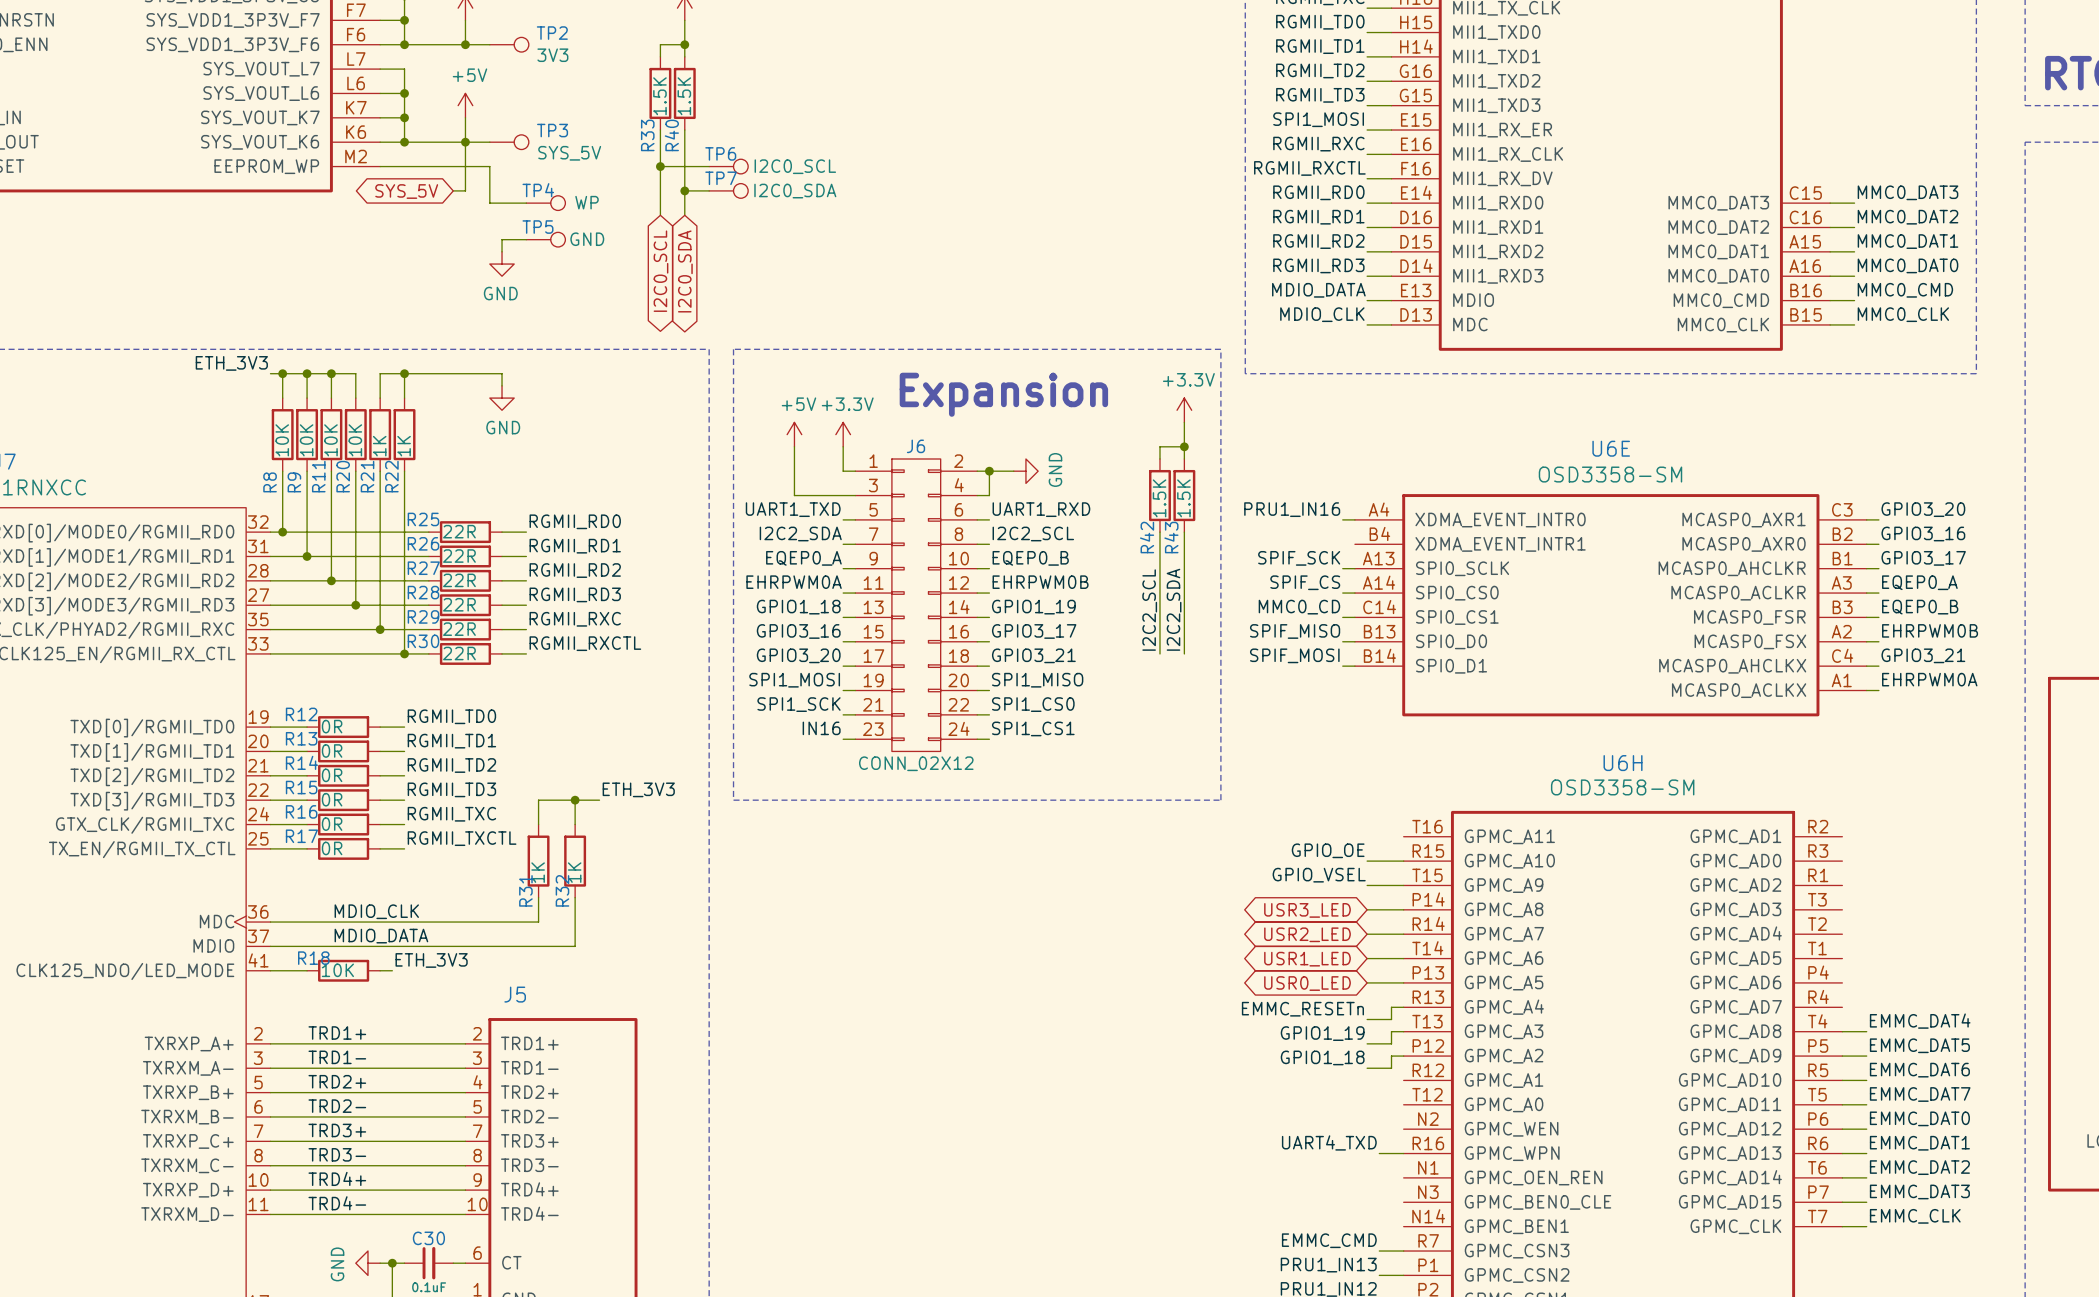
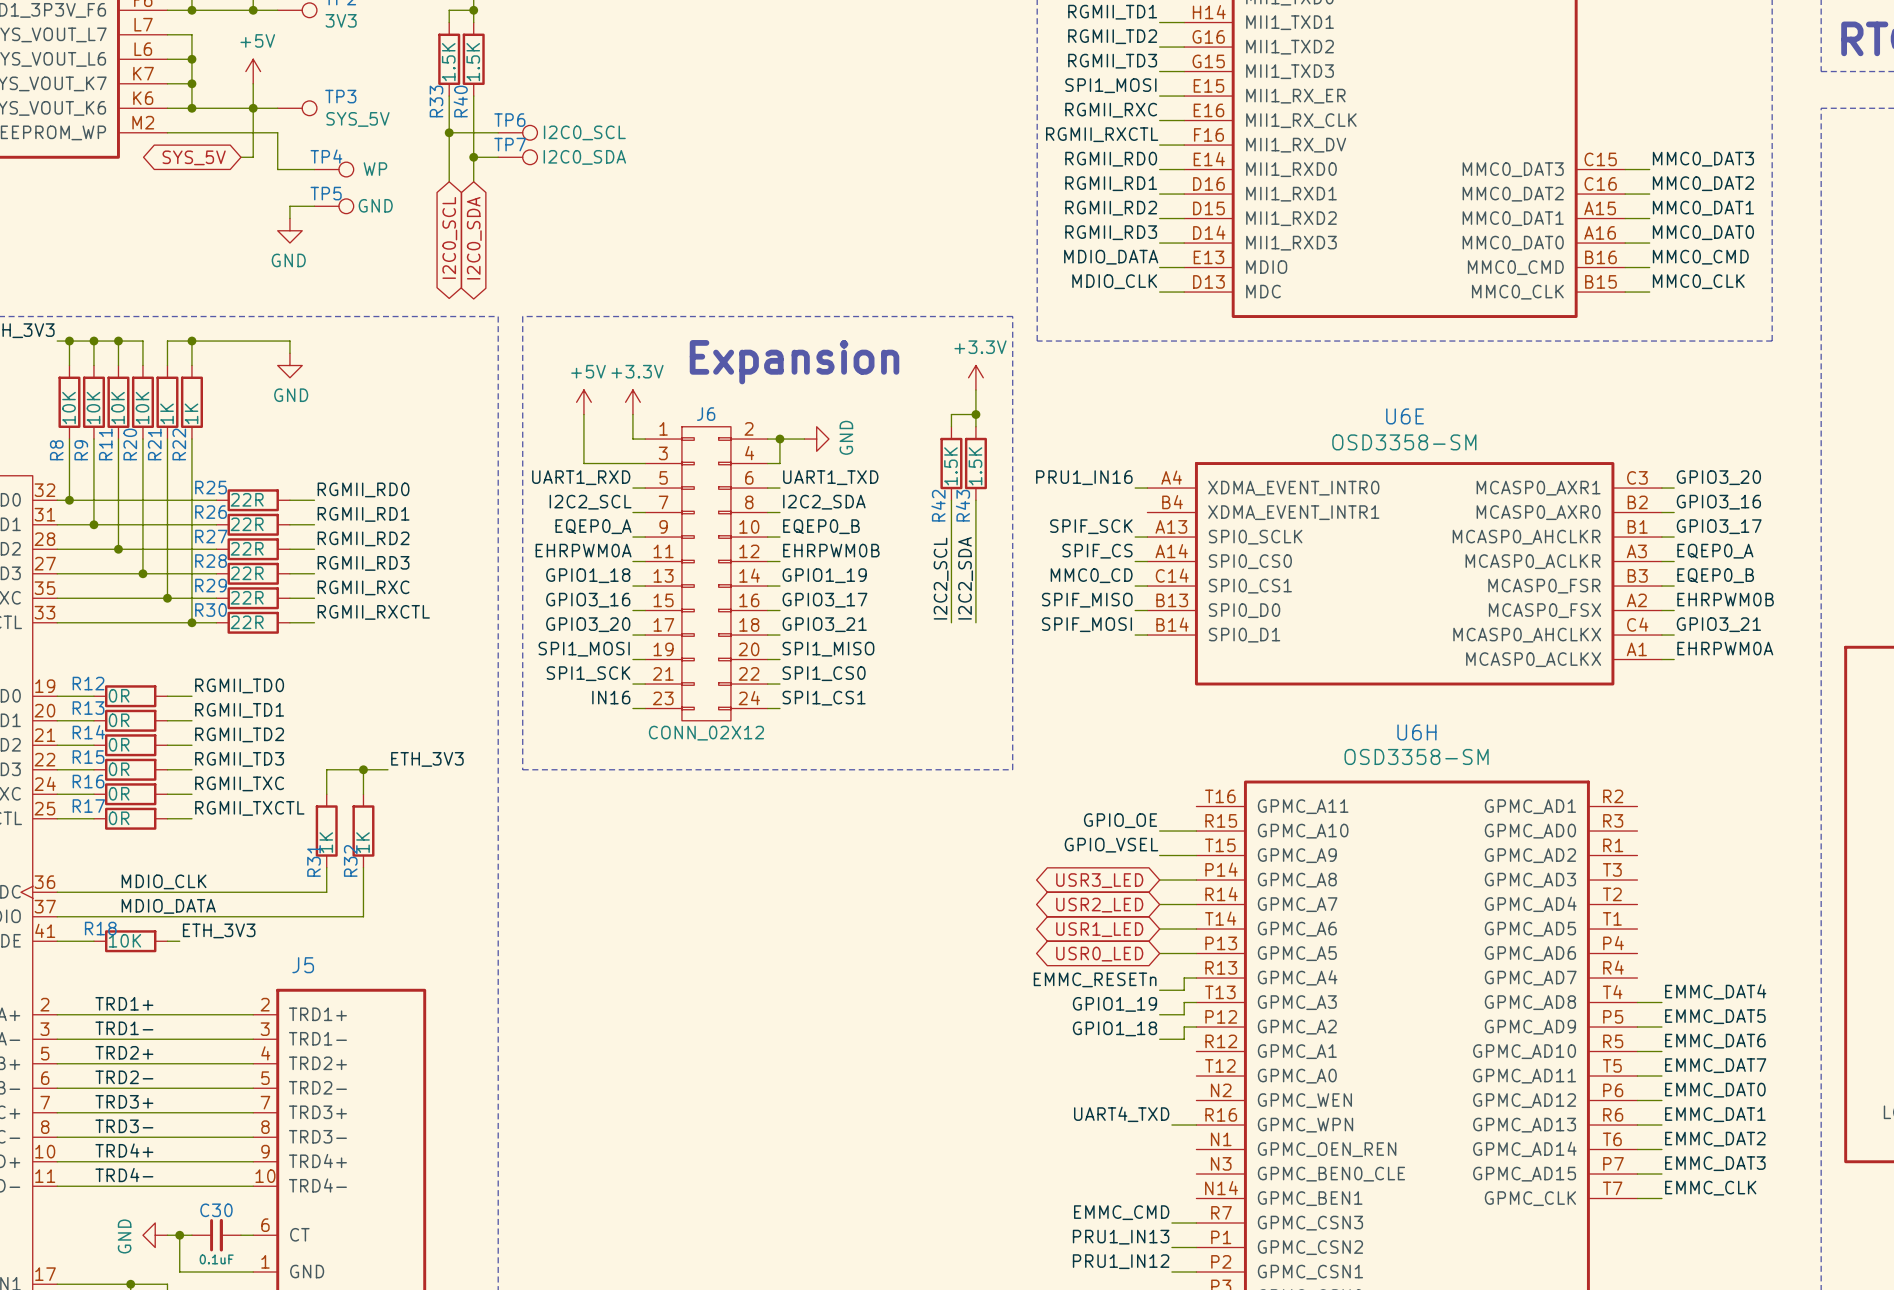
label: UART1_TXD (793, 509) -> UART1_RXD (581, 477)
label: UART1_RXD (1041, 509) -> UART1_TXD (830, 477)
label: I2C2_SDA (800, 534) -> I2C2_SCL (590, 502)
label: I2C2_SCL (1033, 534) -> I2C2_SDA (824, 502)

